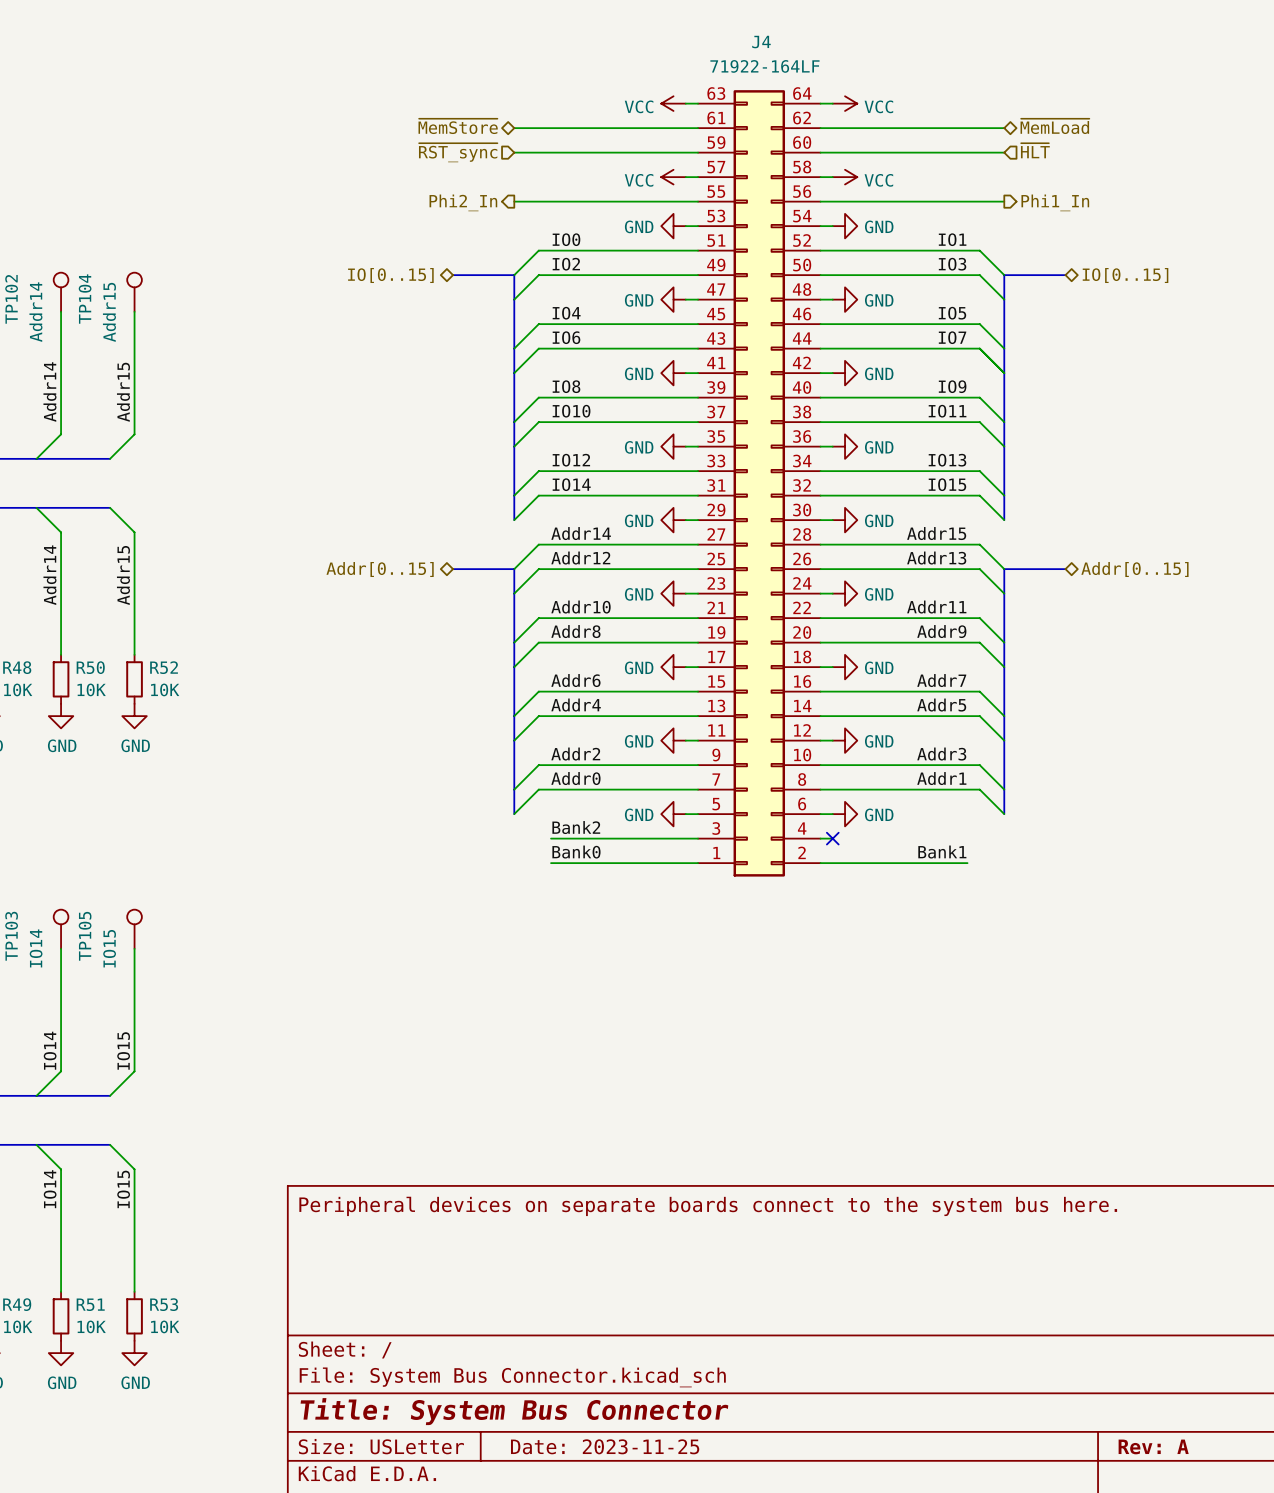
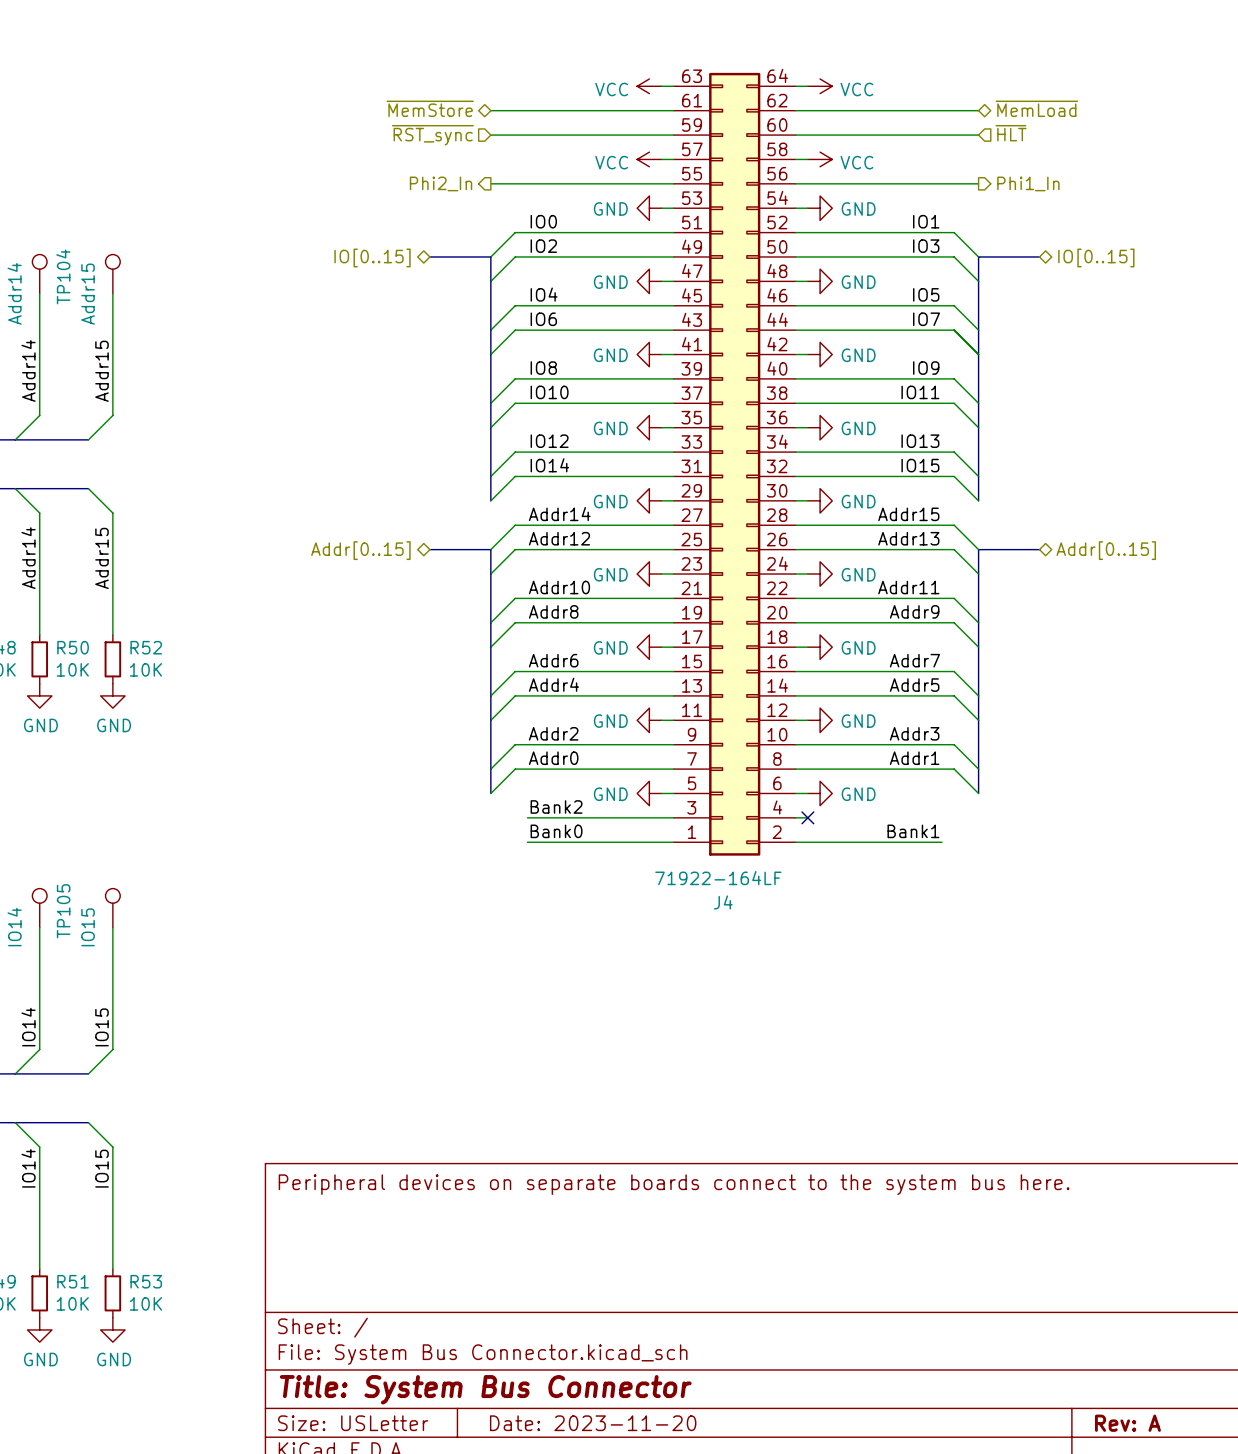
J4 name position: J4 (761, 42) -> J4 (723, 902)
J4 value position: 71922-164LF (764, 66) -> 71922-164LF (718, 878)
title block: Date: 2023-11-25 (605, 1446) -> Date: 2023-11-20 (593, 1423)

